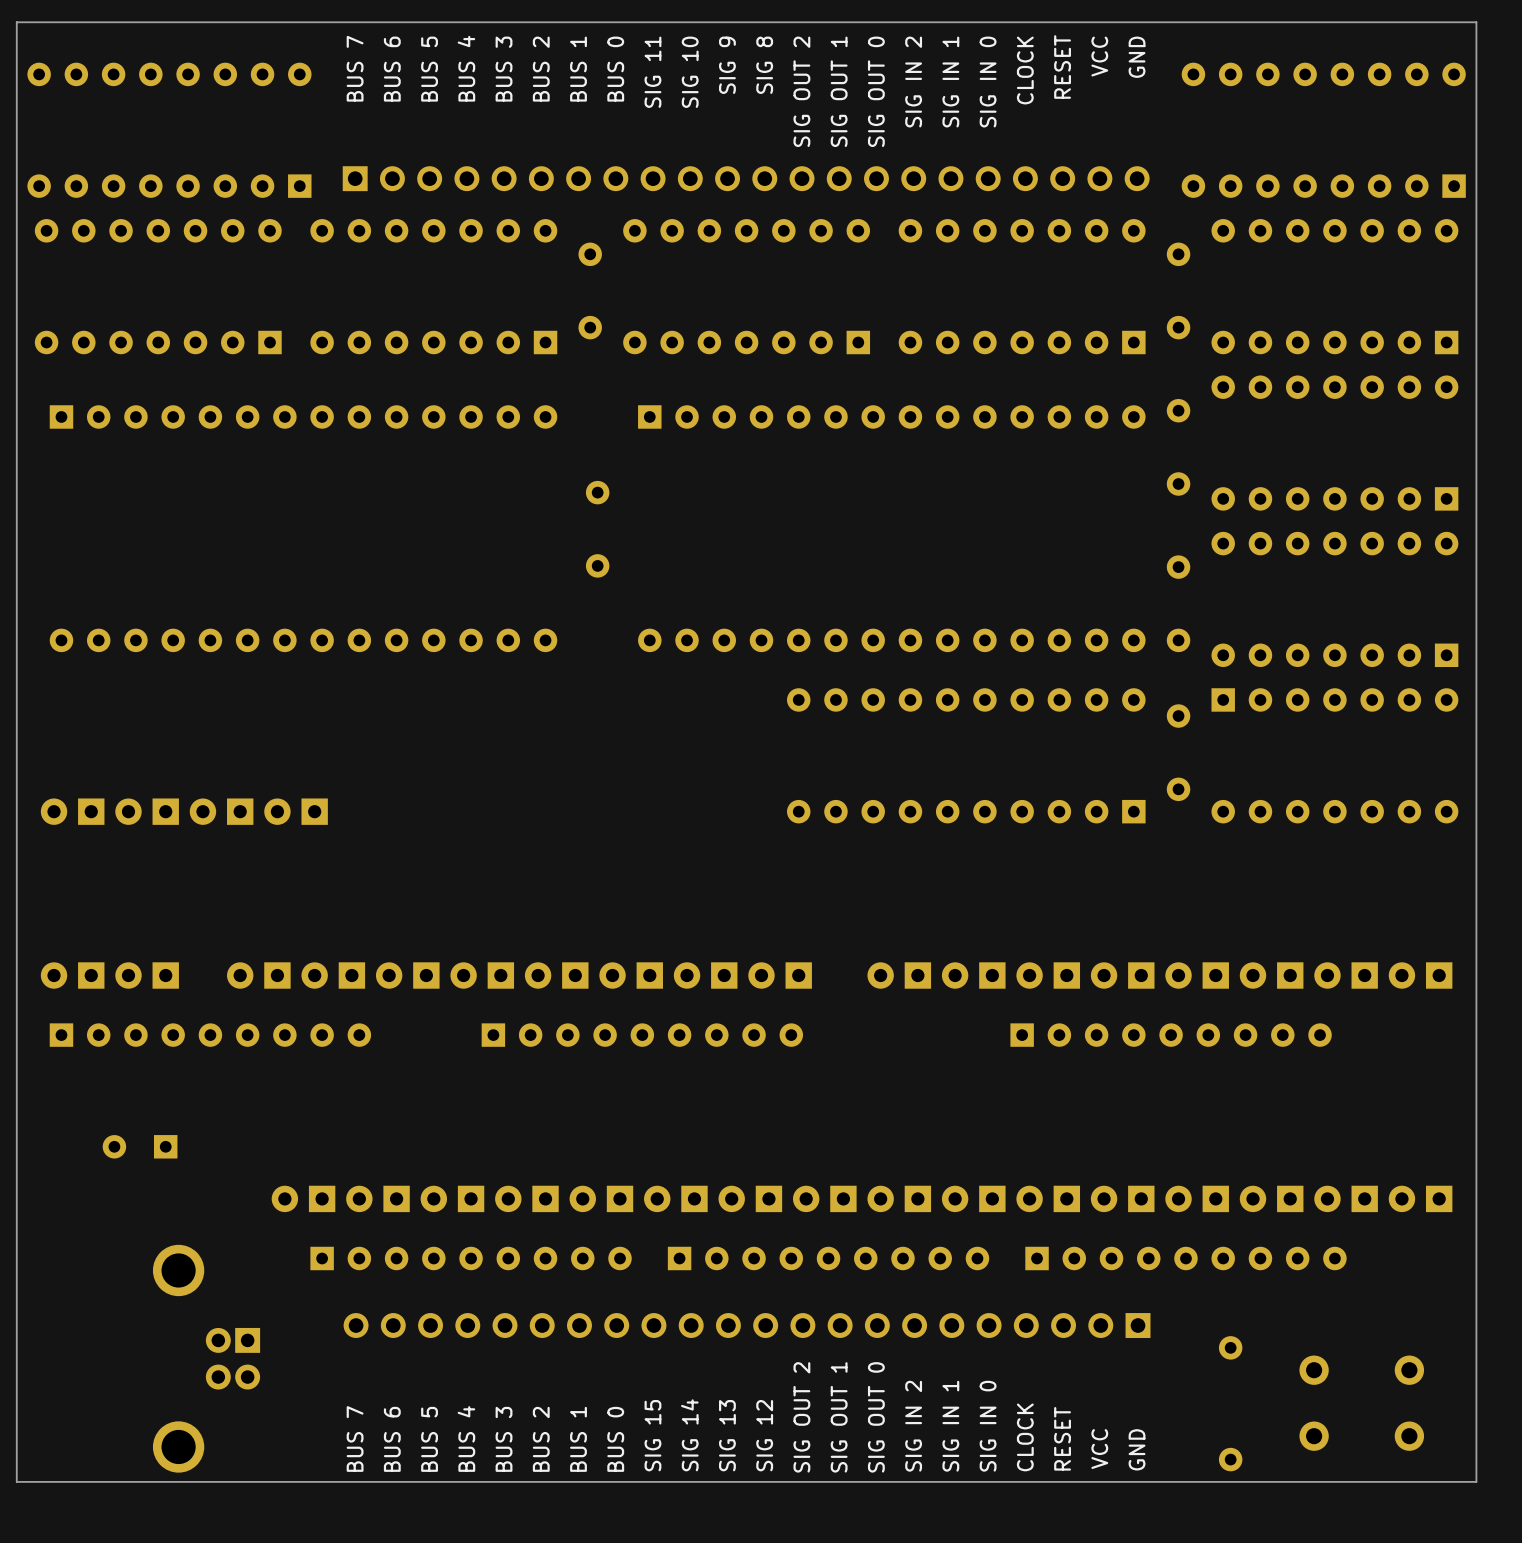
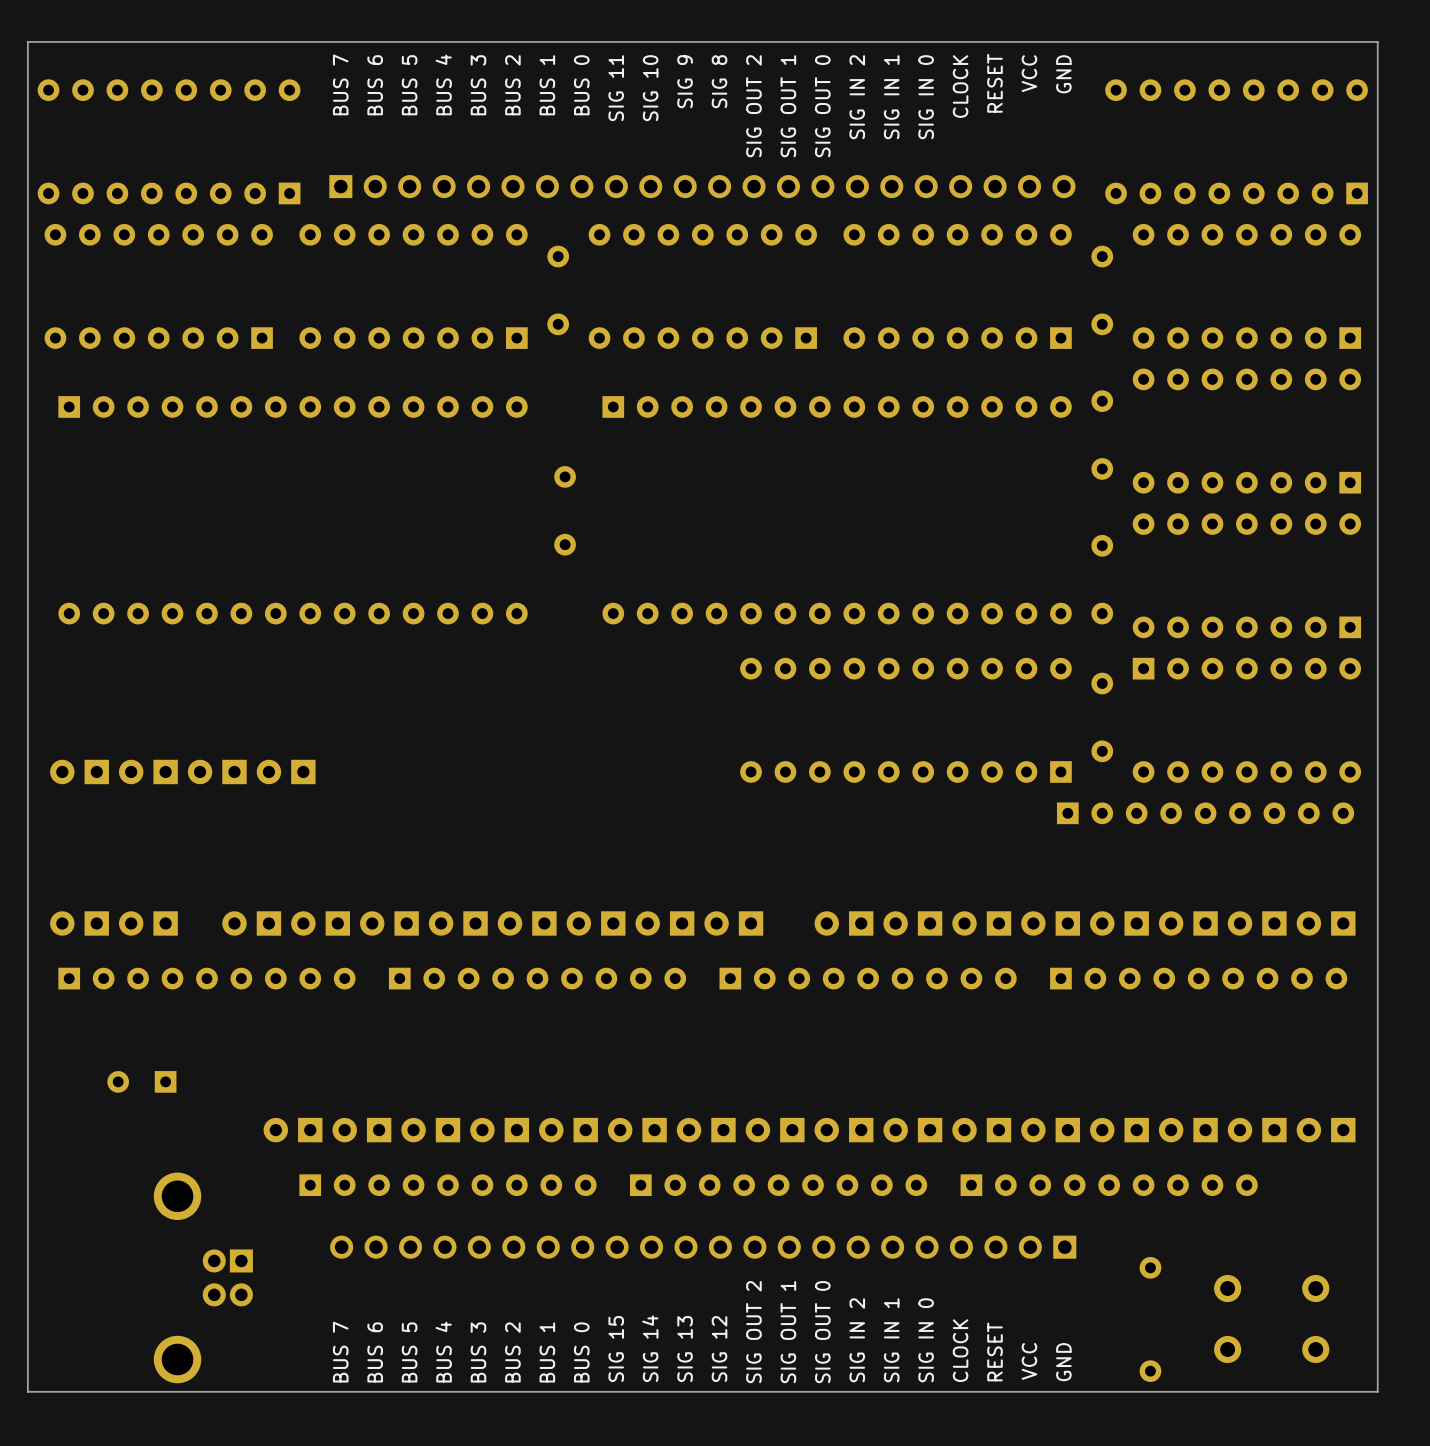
part: none -> (1205, 813)
part position: (642, 1035) -> (537, 978)
part: none -> (868, 978)
part: (1171, 1035) -> none
part: none -> (1198, 978)

